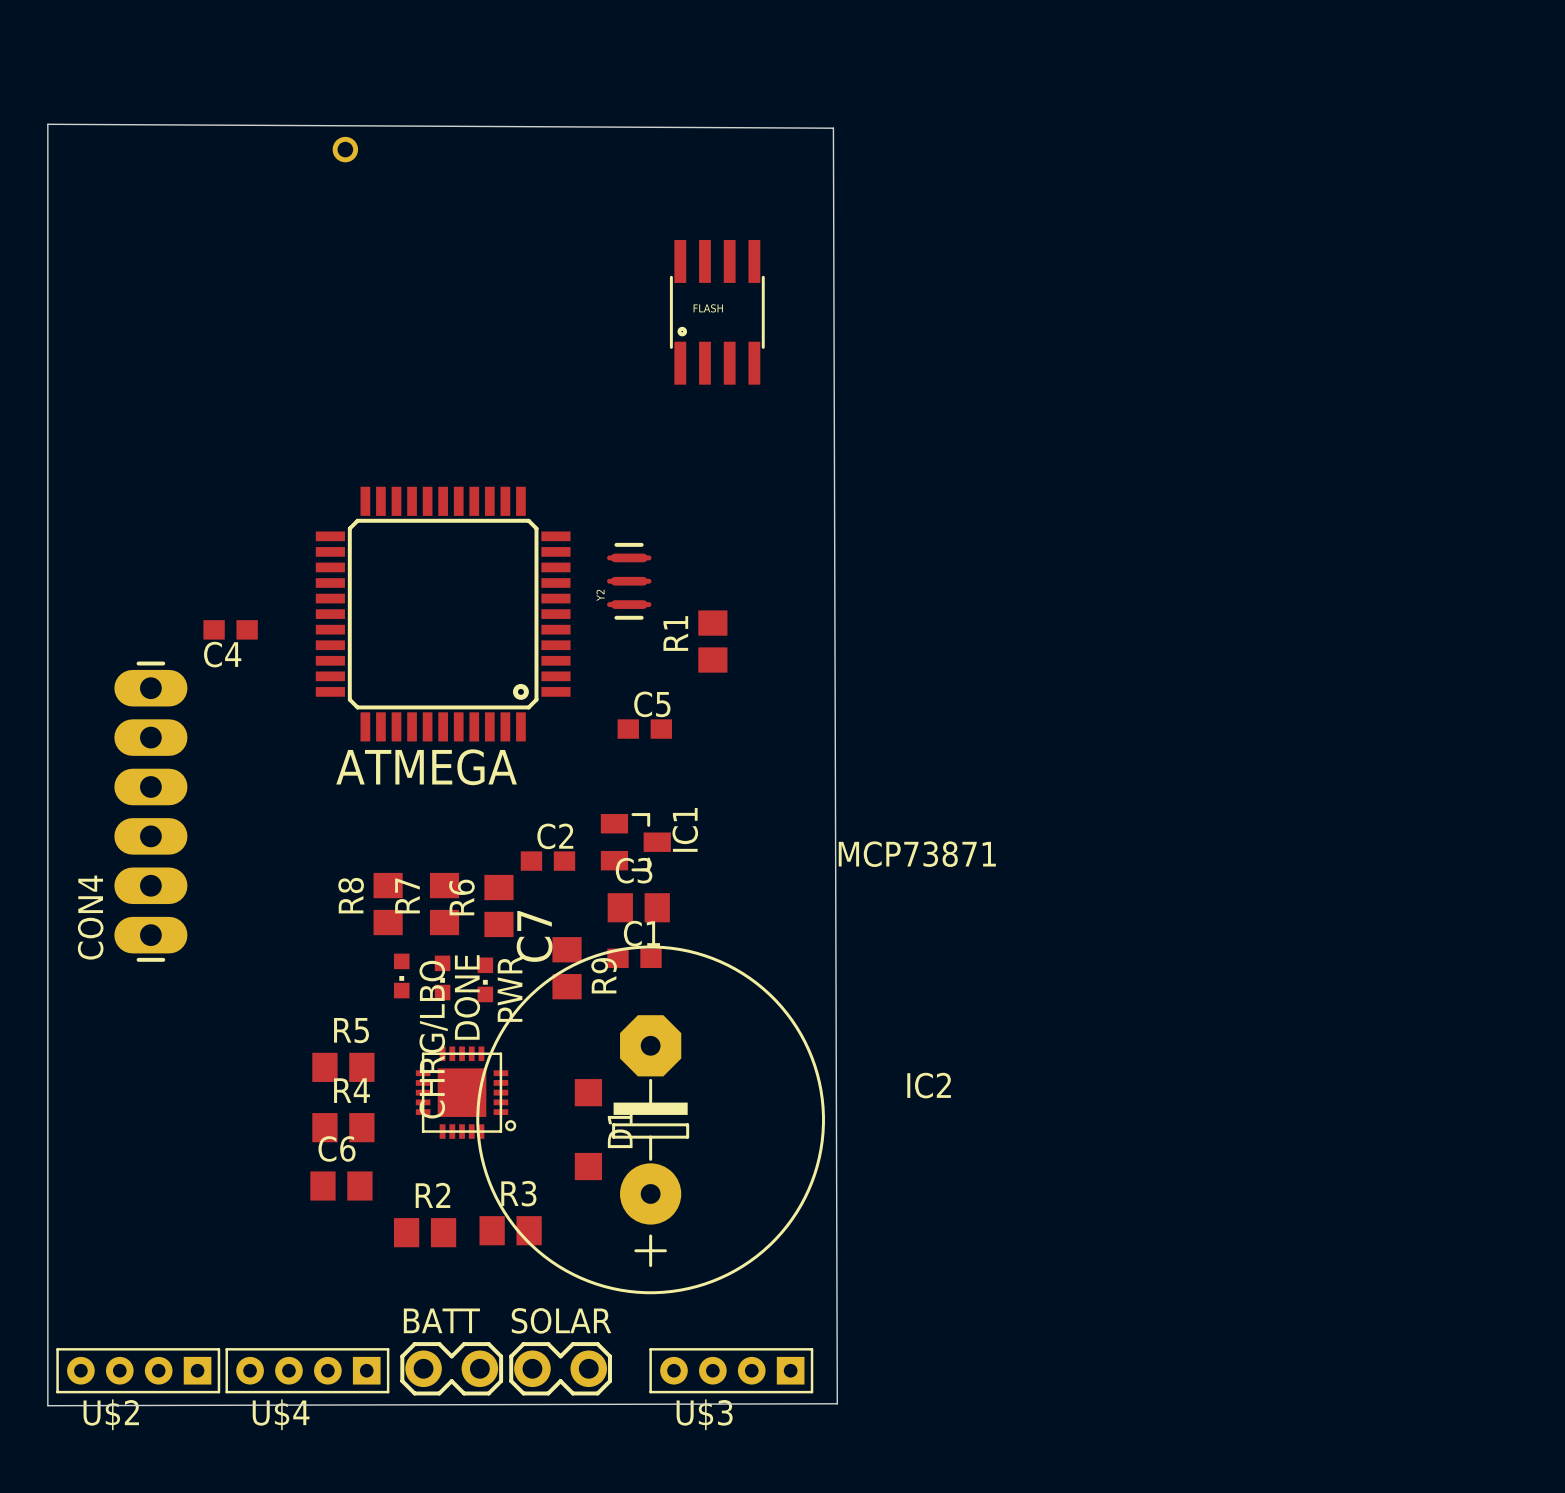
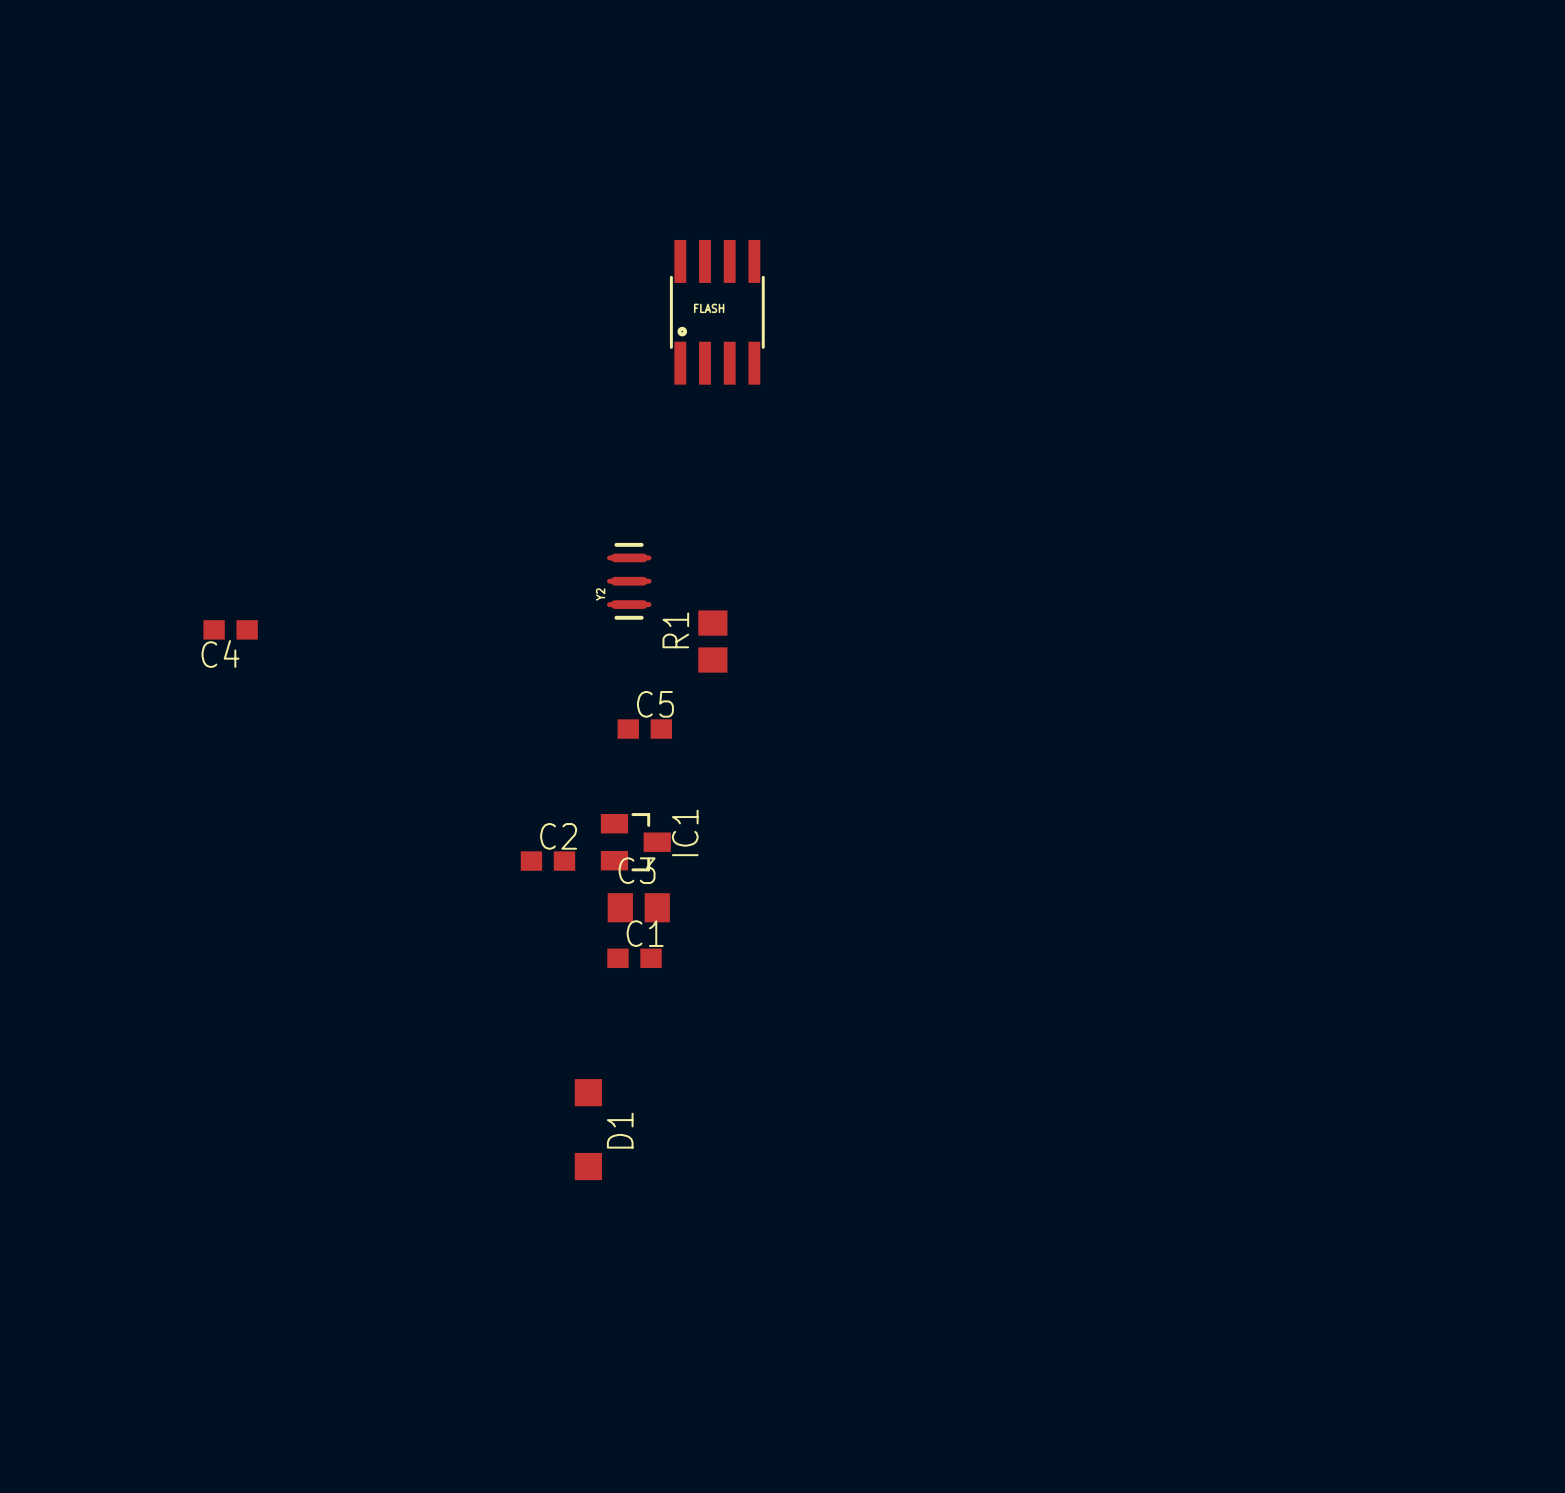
board edge: (47, 124) (833, 128) (837, 1403) (47, 1405) (47, 124) -> none
part: (345, 149) -> none
ATMEGA: (443, 614) -> none
CON4: (150, 811) -> none
R8: (388, 904) -> none
R7: (444, 904) -> none
R6: (498, 905) -> none
R9: (567, 968) -> none
CHRG/LBO: (401, 975) -> none
DONE: (442, 977) -> none
PWR: (485, 979) -> none
R5: (343, 1067) -> none
IC2: MCP73871 (466, 1092) -> none
C7: (650, 1119) -> none
R4: (343, 1127) -> none
C6: (341, 1185) -> none
R3: (510, 1230) -> none
R2: (425, 1232) -> none
BATT: (451, 1368) -> none
SOLAR: (560, 1368) -> none
U$2: (138, 1370) -> none
U$4: (307, 1370) -> none
U$3: (731, 1370) -> none

